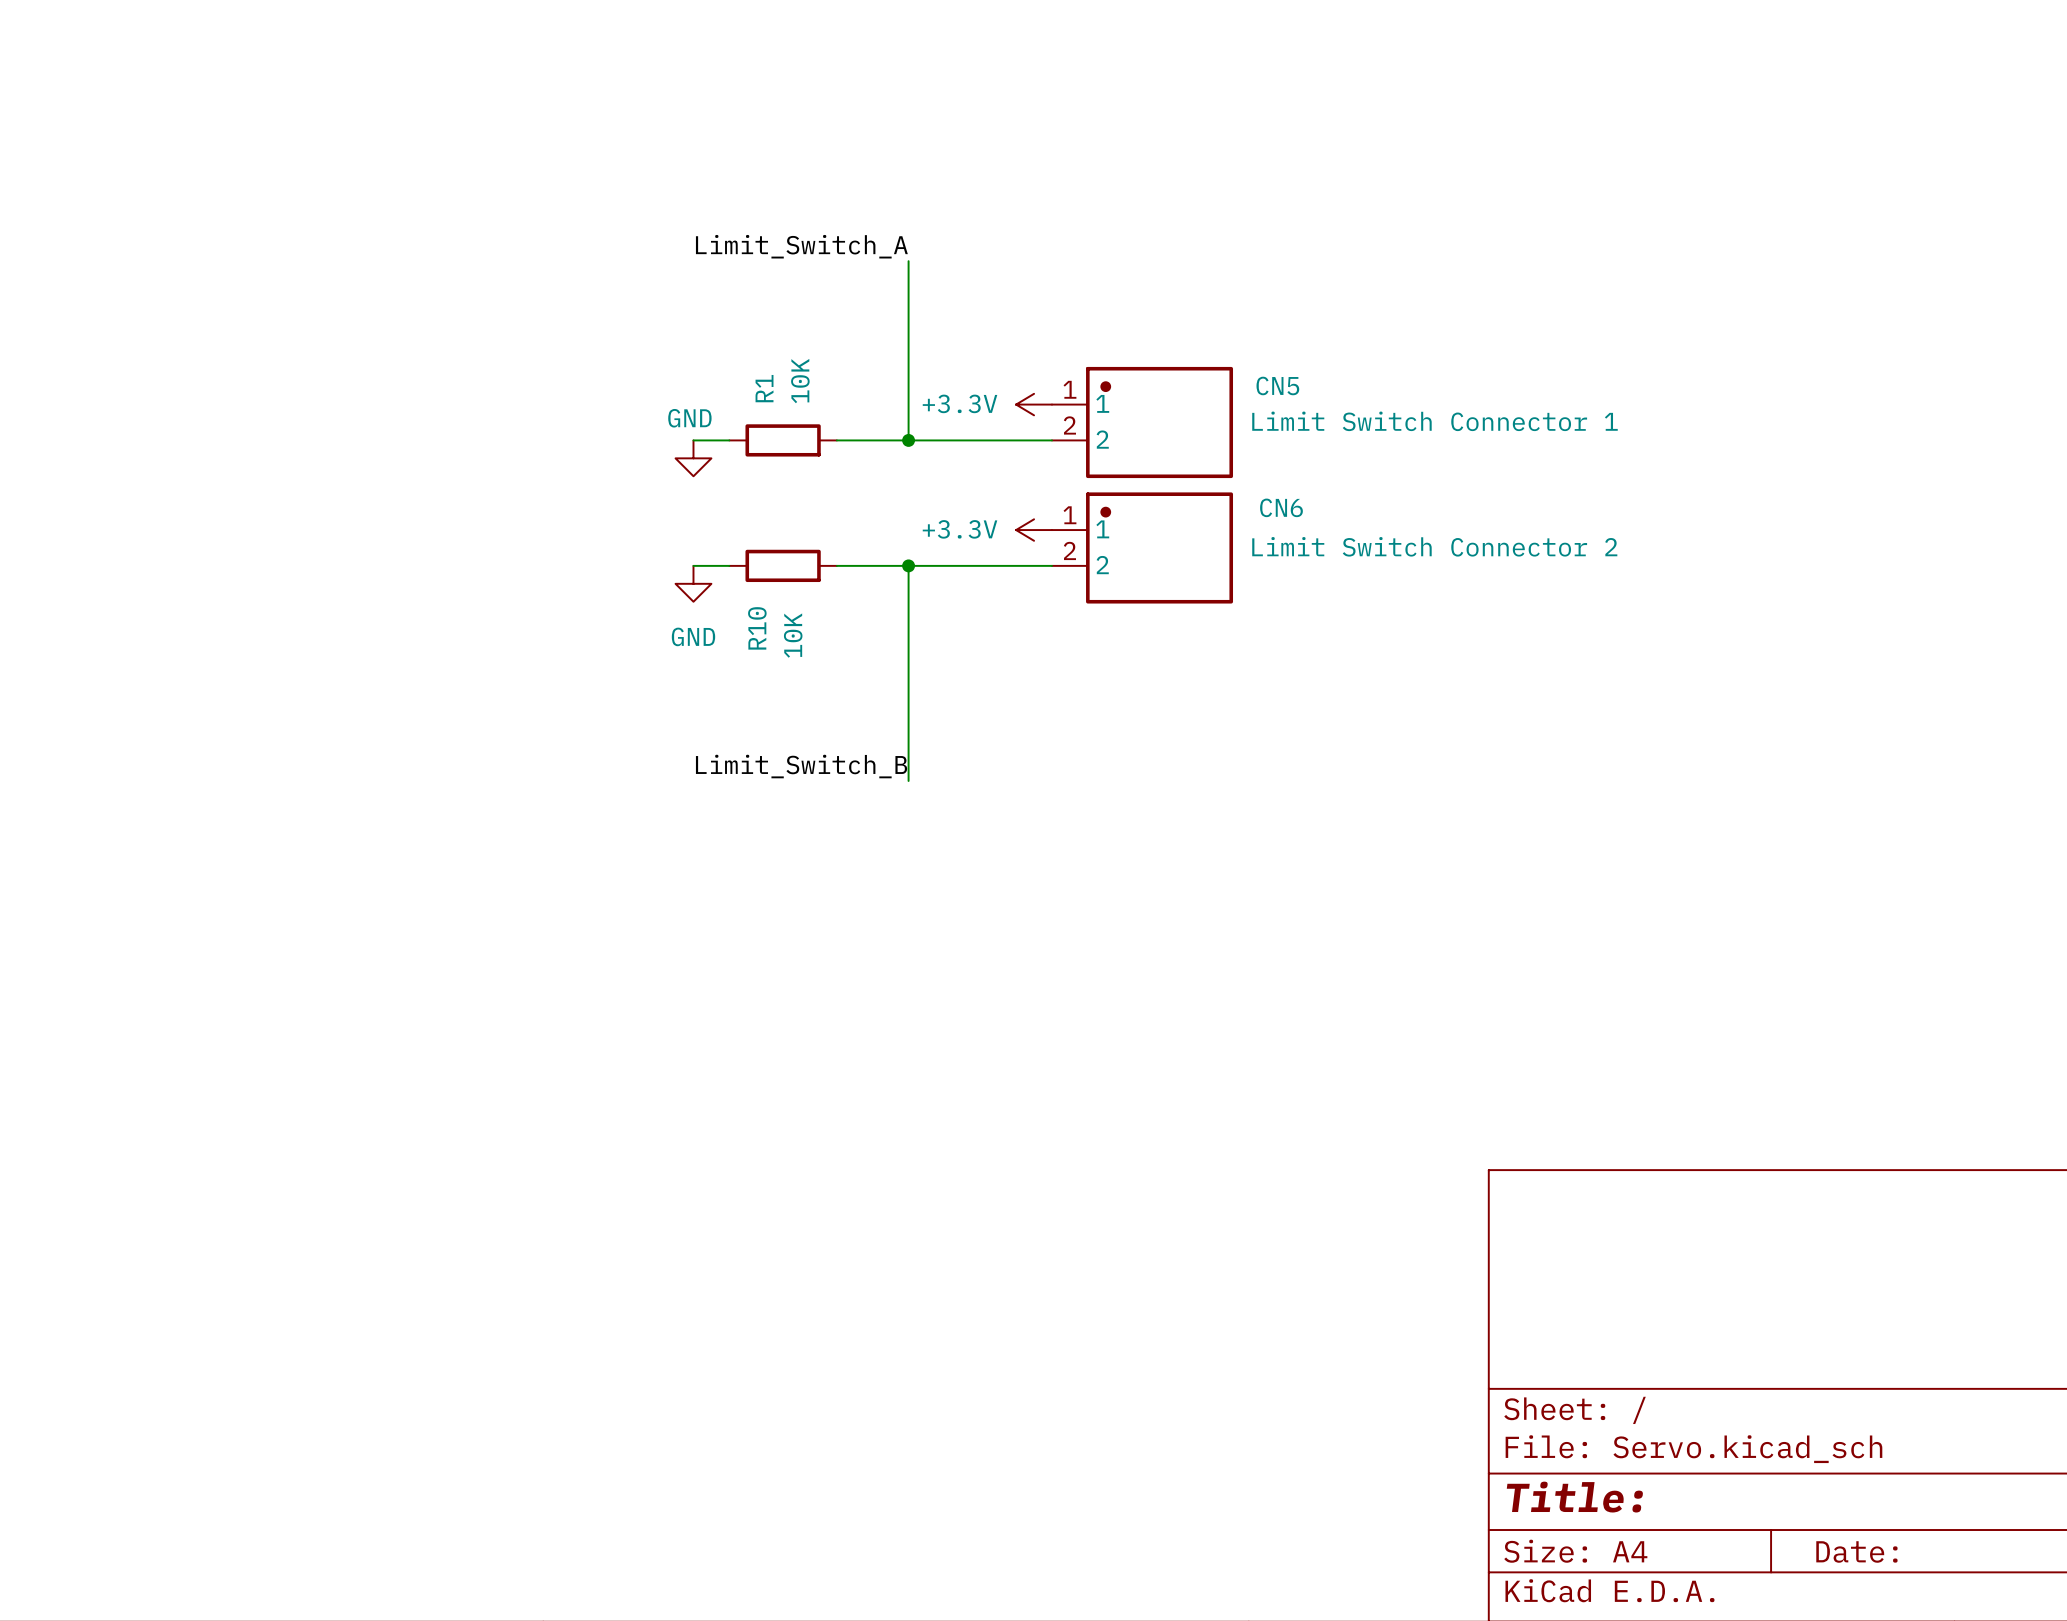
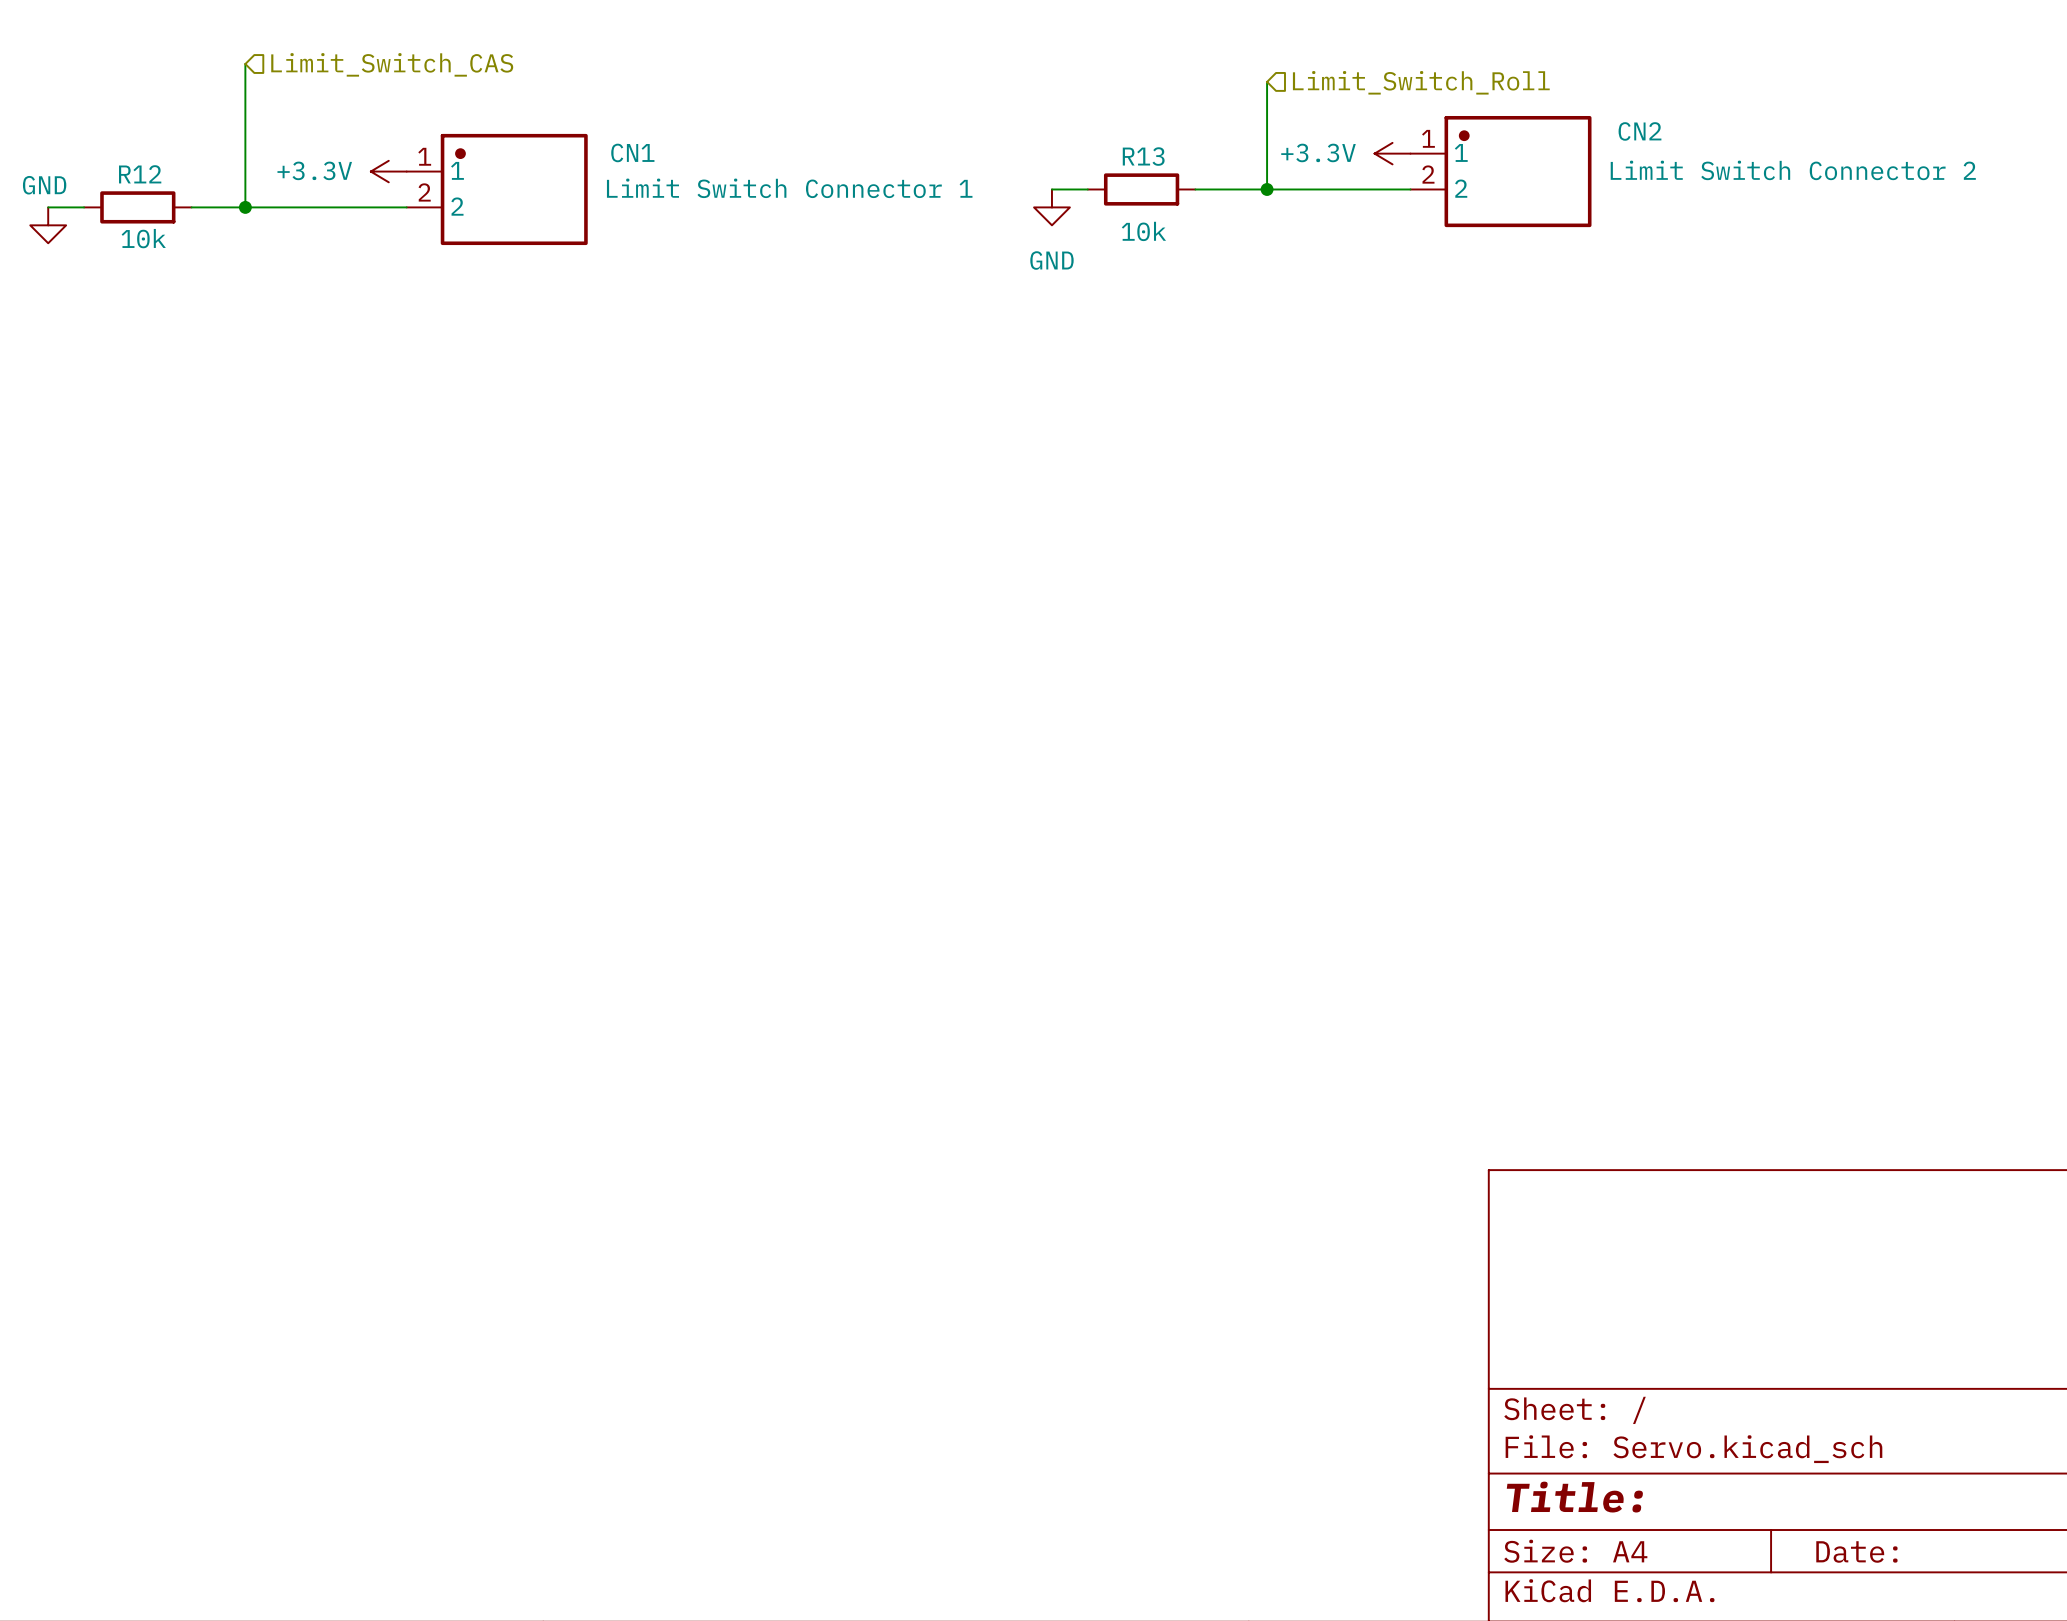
wire: none -> (245, 64) (245, 207)
hierarchical label: none -> Limit_Switch_CAS (392, 64)
wire: none -> (1267, 81) (1267, 189)
hierarchical label: none -> Limit_Switch_Roll (1421, 82)
power symbol: none -> +3.3V (1392, 153)
power symbol: none -> +3.3V (388, 171)
CN2: none -> Limit Switch Connector 2 (1500, 171)
CN1: none -> Limit Switch Connector 1 (497, 189)
wire: none -> (1051, 189) (1087, 189)
R13: none -> 10k (1141, 189)
wire: none -> (1195, 189) (1410, 189)
junction: none -> (1267, 189)
wire: none -> (48, 207) (84, 207)
R12: none -> 10k (137, 207)
wire: none -> (191, 207) (406, 207)
junction: none -> (245, 207)
power symbol: none -> GND (1051, 207)
power symbol: none -> GND (48, 225)
label: Limit_Switch_A (801, 246) -> none
wire: (908, 261) (908, 440) -> none
power symbol: +3.3V (1034, 404) -> none
CN5: Limit Switch Connector 1 (1142, 422) -> none
wire: (693, 440) (729, 440) -> none
R1: 10K (783, 440) -> none
wire: (836, 440) (1051, 440) -> none
junction: (908, 440) -> none
power symbol: GND (693, 458) -> none
power symbol: +3.3V (1034, 530) -> none
CN6: Limit Switch Connector 2 (1142, 547) -> none
wire: (693, 565) (729, 565) -> none
R10: 10K (783, 565) -> none
wire: (836, 565) (1051, 565) -> none
wire: (908, 565) (908, 780) -> none
junction: (908, 565) -> none
power symbol: GND (693, 583) -> none
label: Limit_Switch_B (801, 766) -> none

